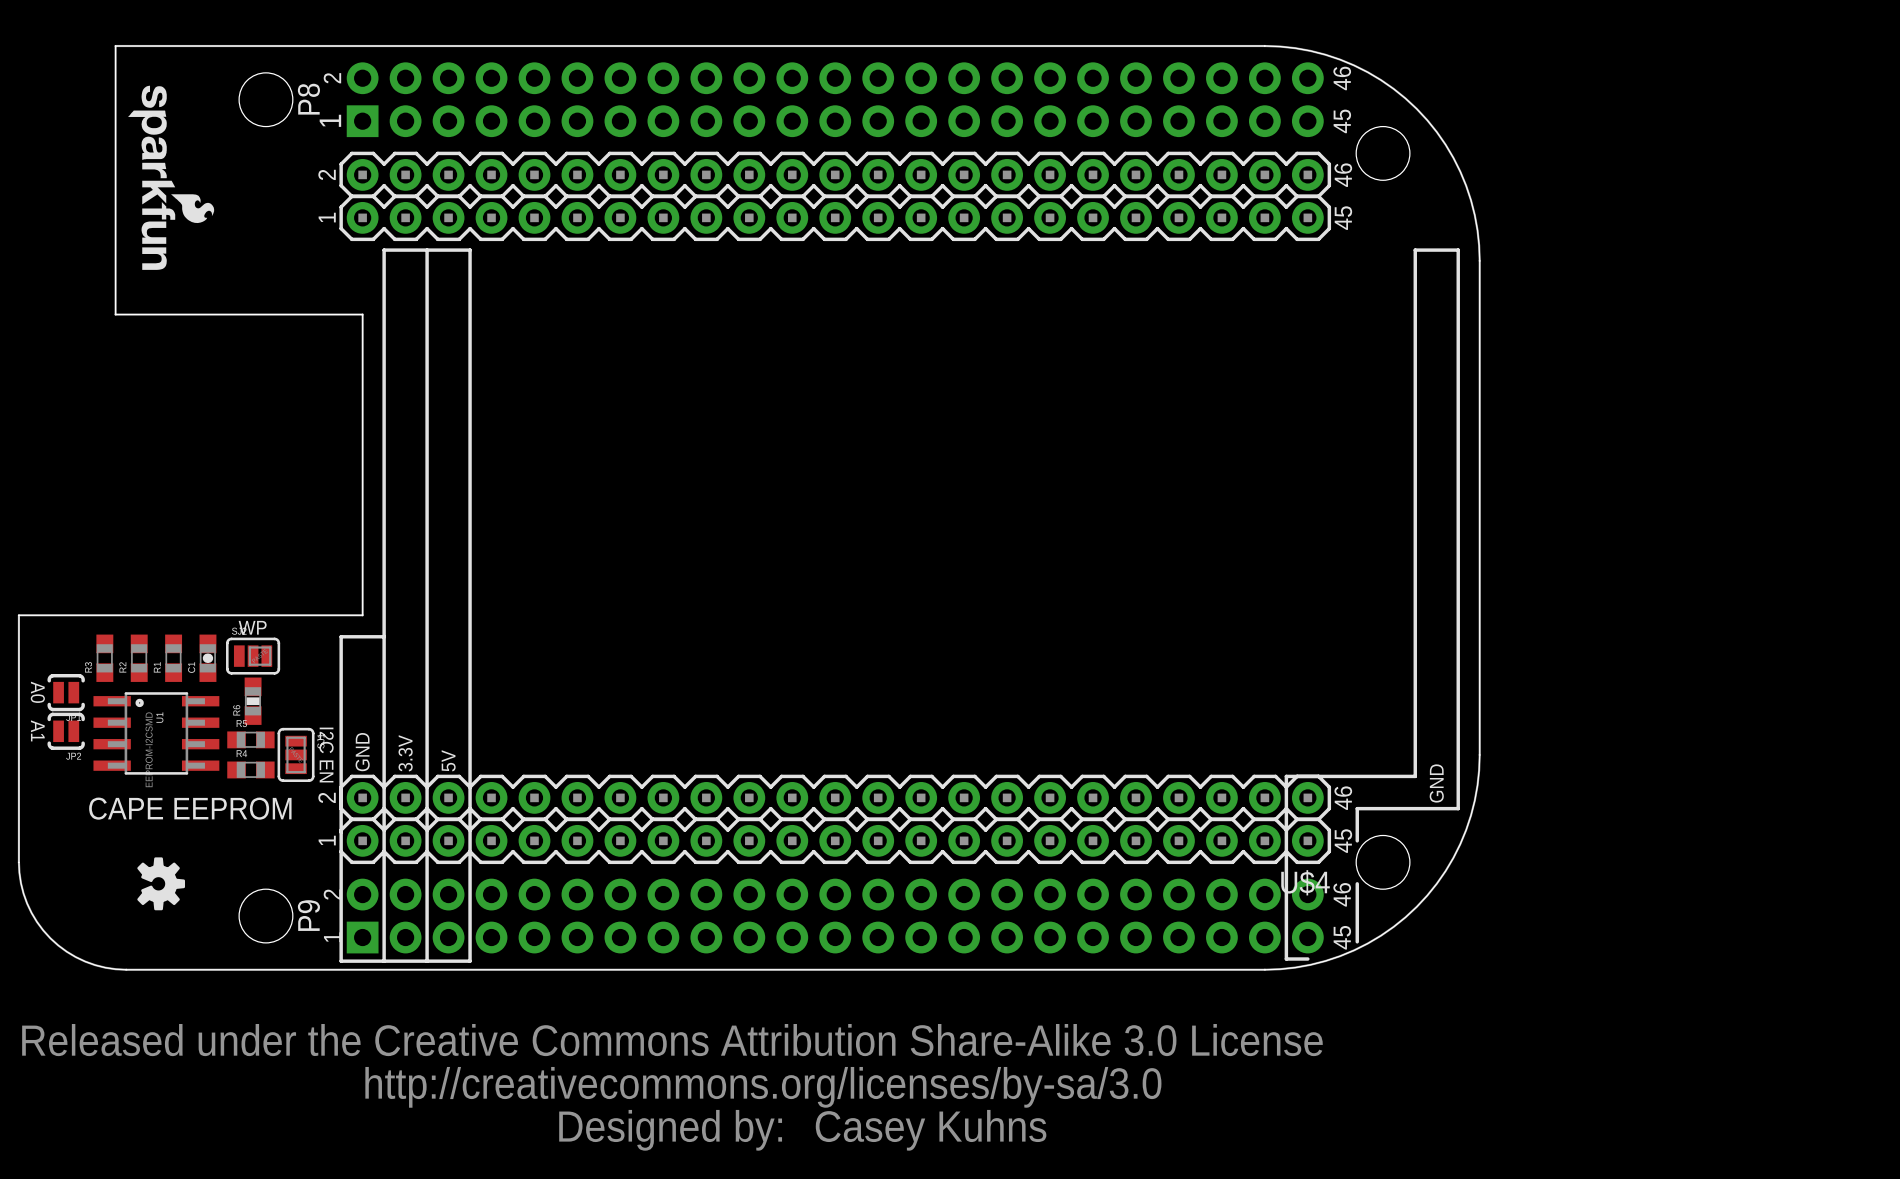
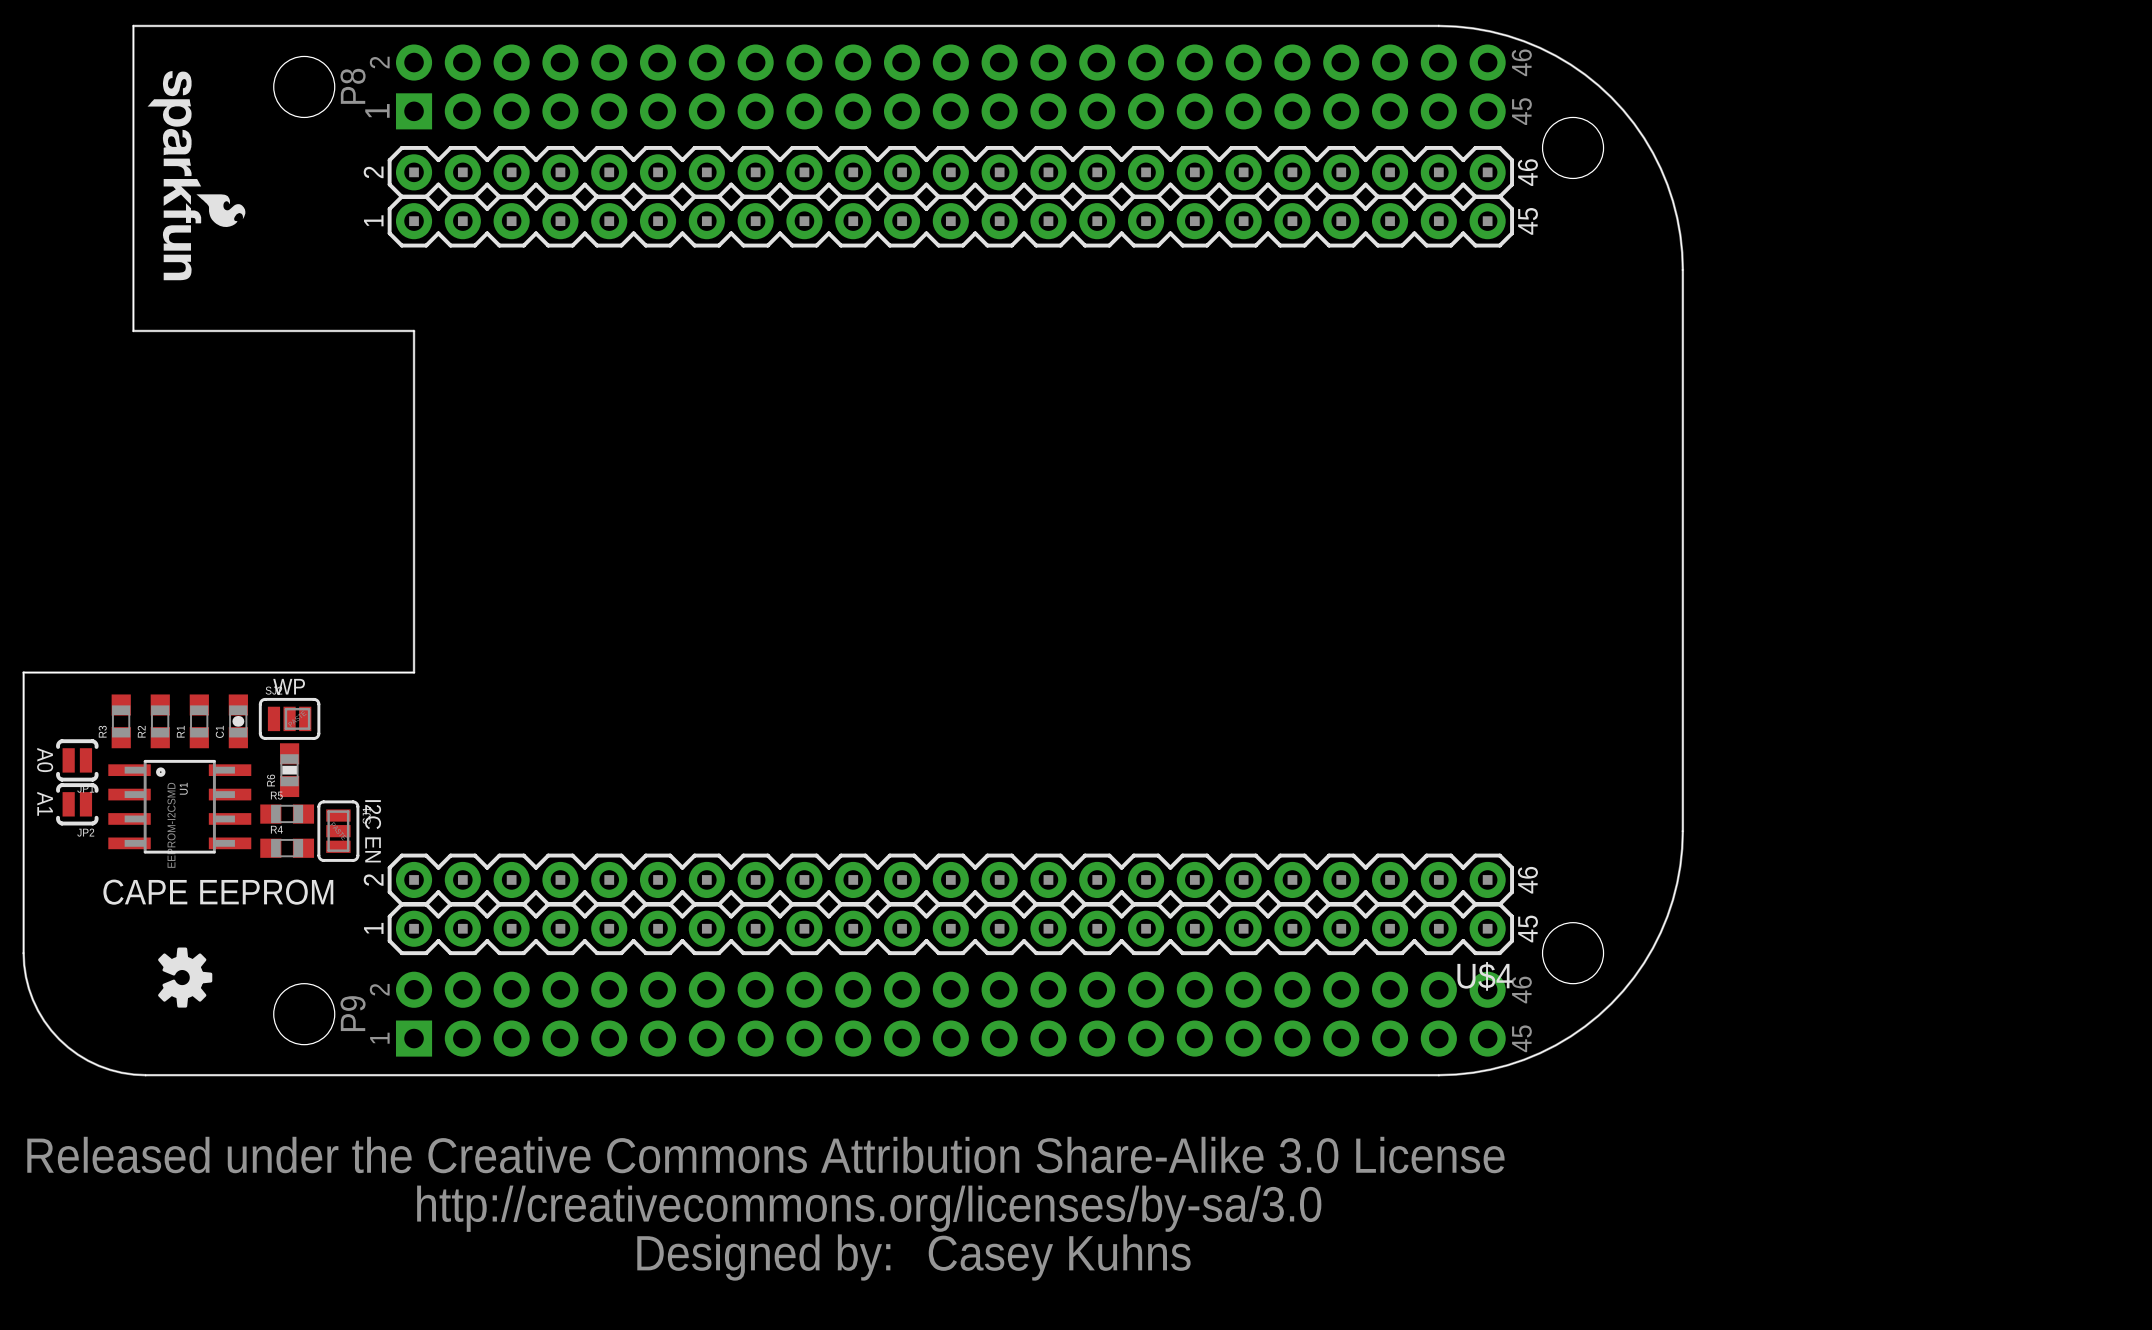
part footprint: [17, 44, 1481, 971] -> [22, 24, 1685, 1077]
line: (427, 250) (427, 851) -> none
line: (384, 636) (341, 636) (341, 832) -> none
text: GND (362, 752) -> none
text: 3.3V (405, 753) -> none
text: 5V (448, 760) -> none
text: GND (1436, 783) -> none
line: (1357, 840) (1357, 808) (1458, 808) (1458, 250) (1415, 250) (1415, 776) (1286, 776) (1286, 959) (1307, 959) -> none
line: (341, 851) (341, 961) (470, 961) (470, 250) (384, 250) (384, 851) -> none
line: (384, 853) (384, 961) -> none
line: (427, 853) (427, 961) -> none
line: (1357, 883) (1357, 941) -> none

